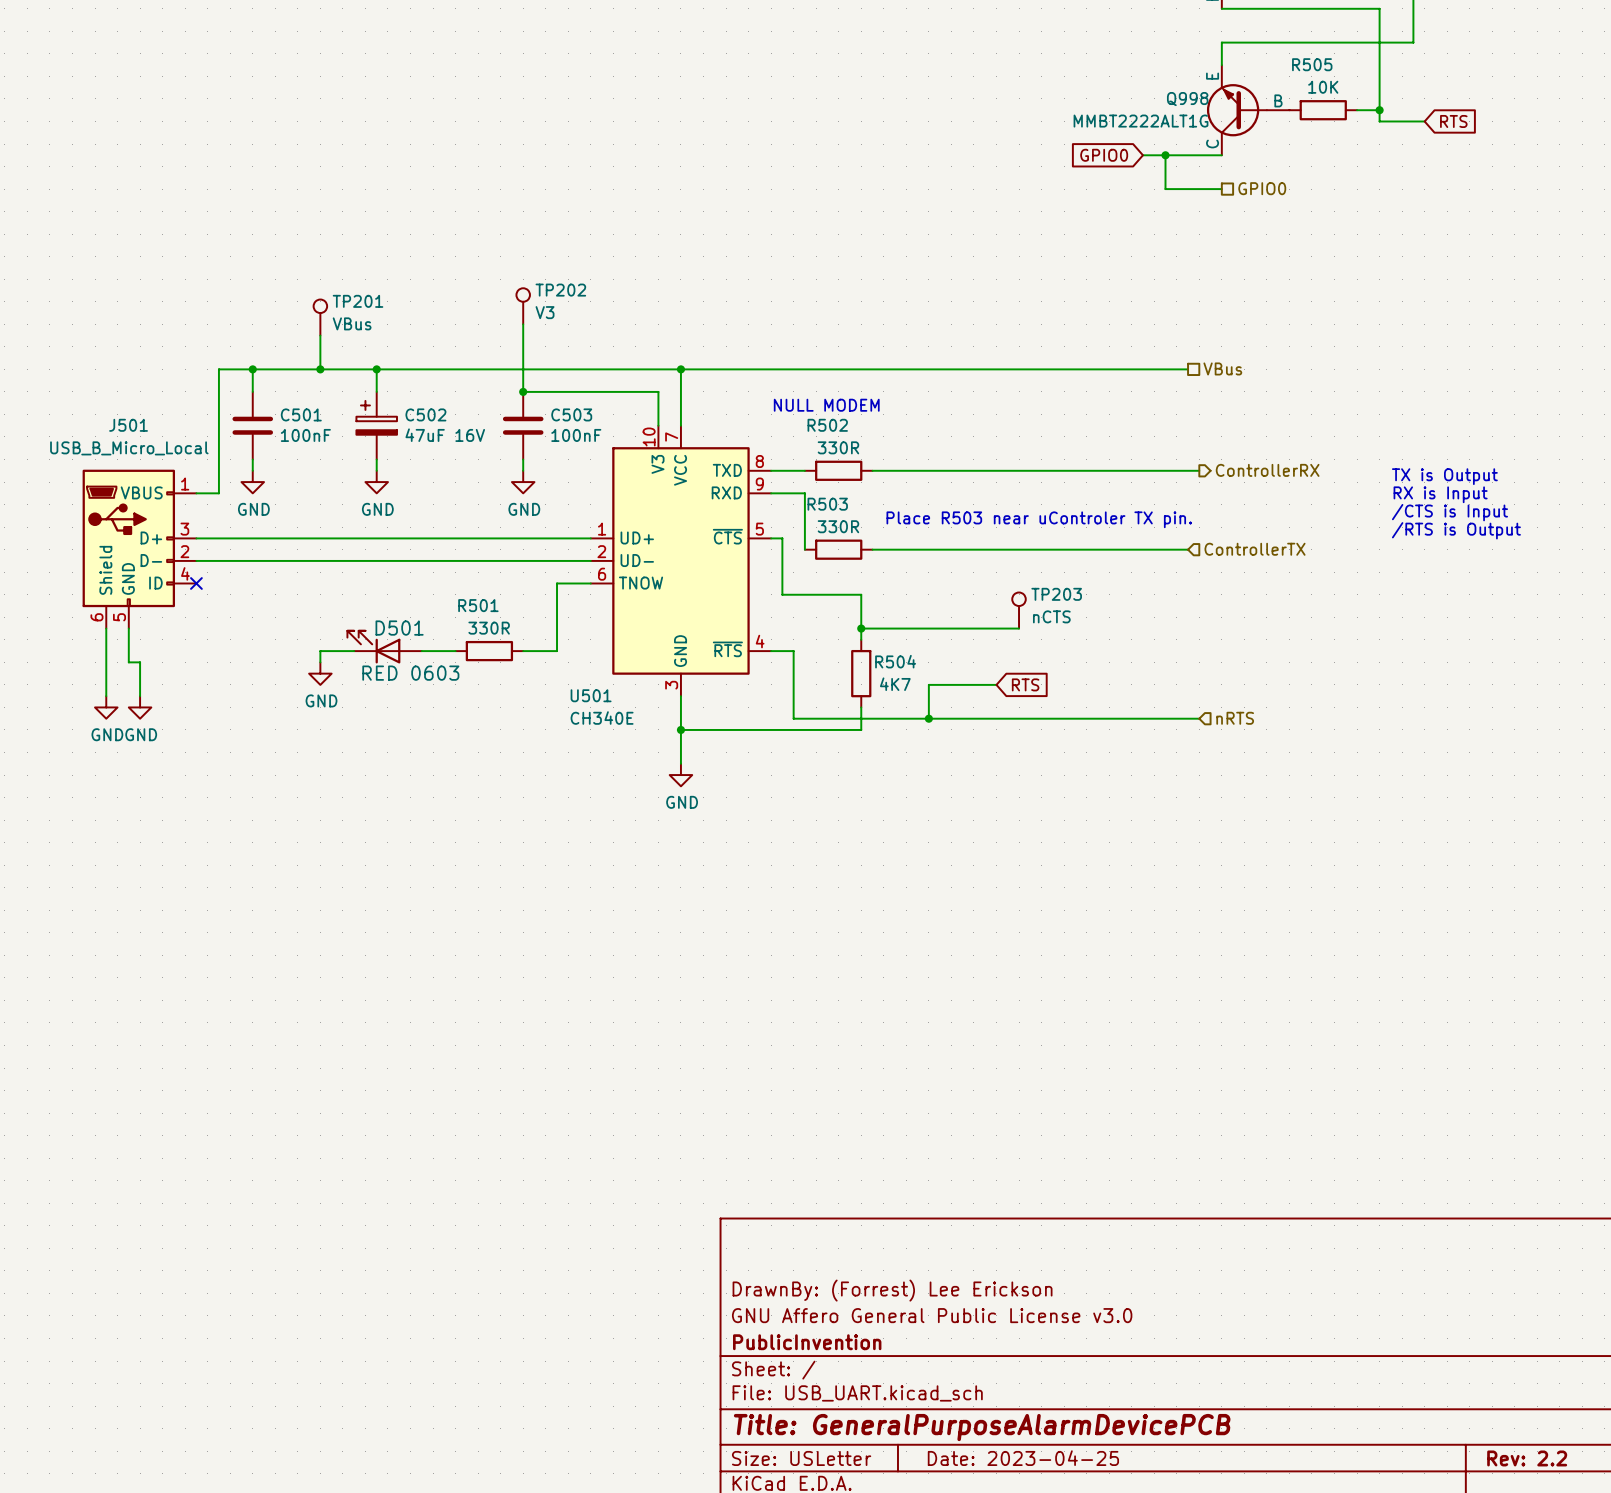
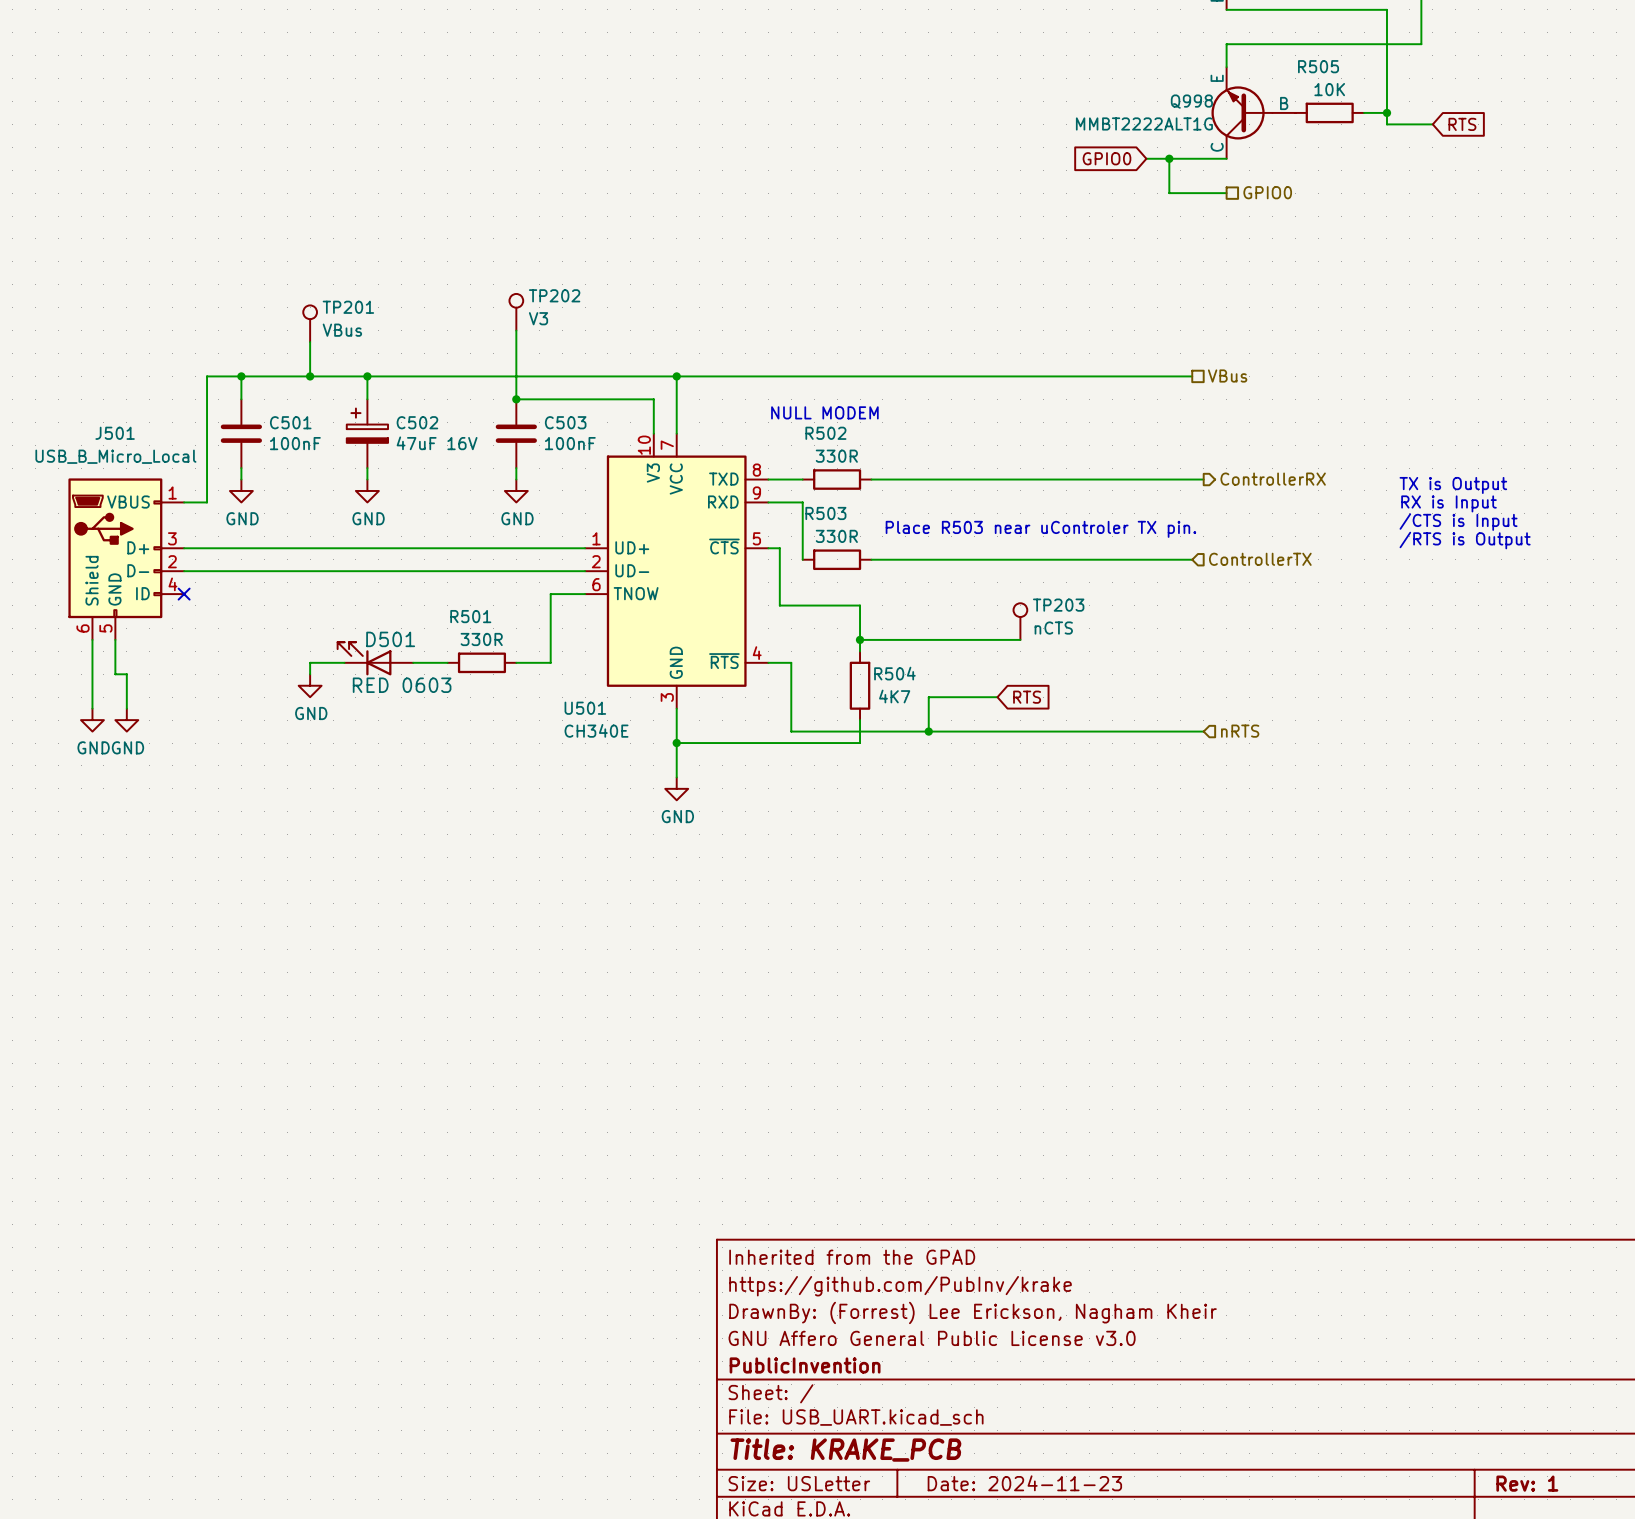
title block: none -> Inherited from the GPAD (852, 1257)
title block: none -> https://github.com/PubInv/krake (900, 1286)
title block: DrawnBy: (Forrest) Lee Erickson (892, 1290) -> DrawnBy: (Forrest) Lee Erickson, Nagham Kheir (973, 1312)
title block: Title: GeneralPurposeAlarmDevicePCB (982, 1427) -> Title: KRAKE_PCB (845, 1450)
title block: Date: 2023-04-25 (1023, 1458) -> Date: 2024-11-23 (1024, 1483)
title block: Rev: 2.2 (1527, 1458) -> Rev: 1 (1527, 1483)

